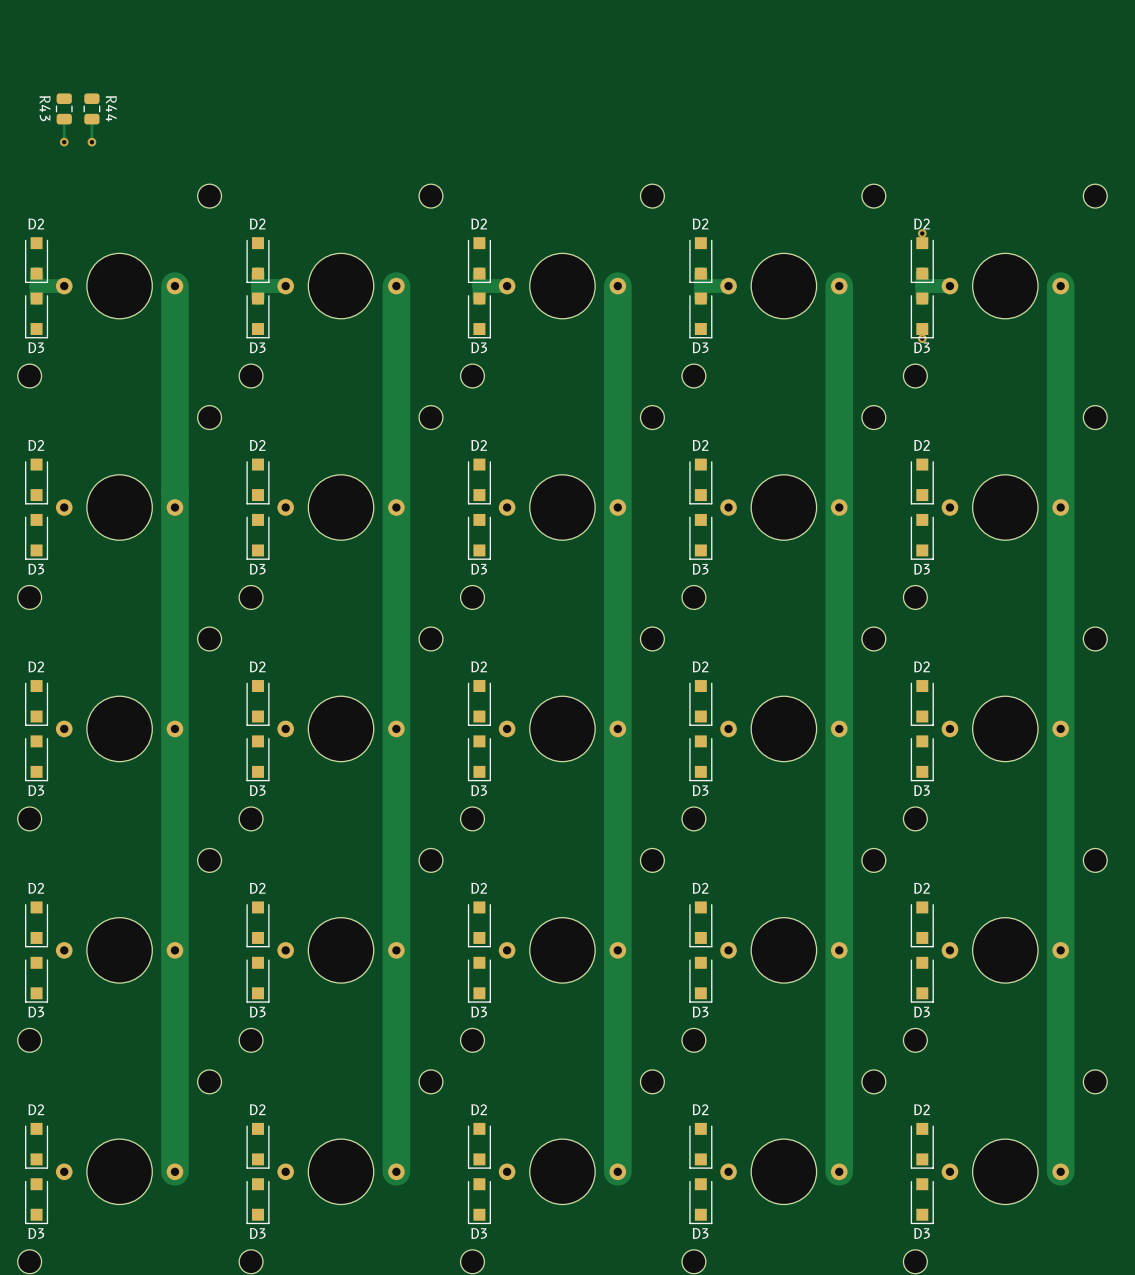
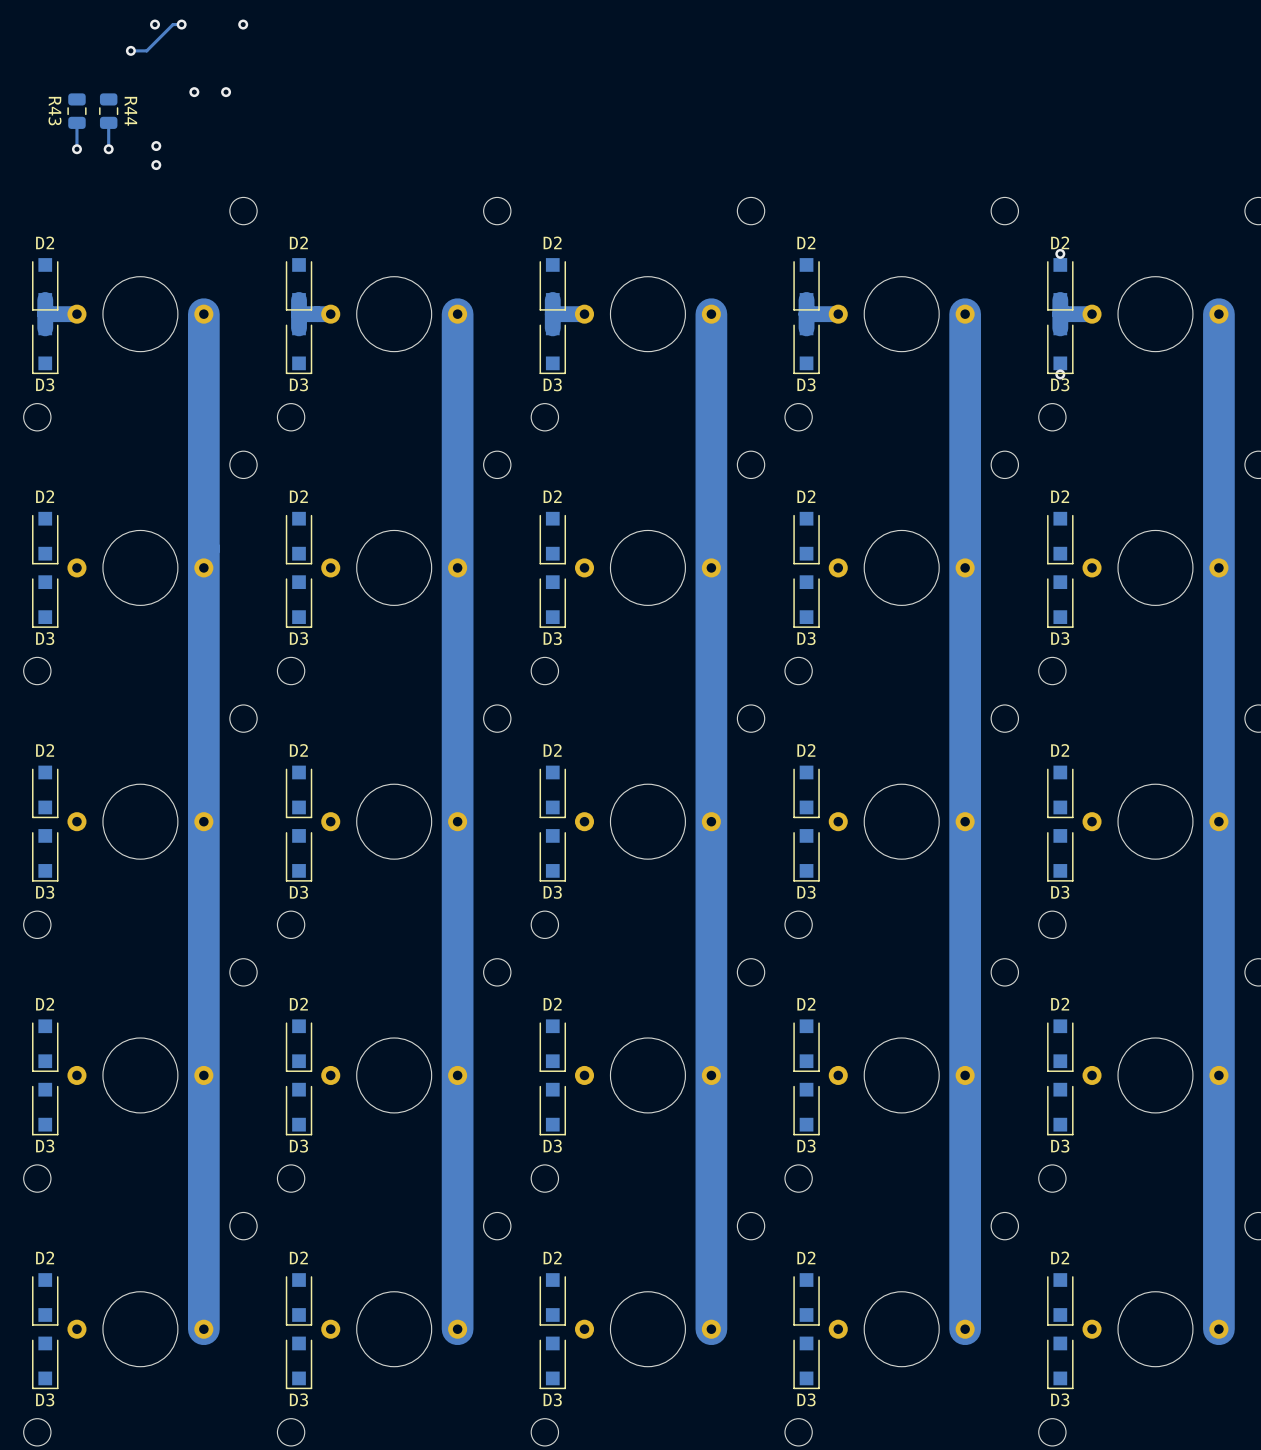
via: none -> (155, 24)
track: none -> (181, 24) (173, 24) (146, 50) (130, 50)
via: none -> (181, 24)
via: none -> (243, 24)
via: none -> (130, 50)
via: none -> (194, 92)
via: none -> (226, 92)
via: none -> (156, 146)
via: none -> (156, 165)

